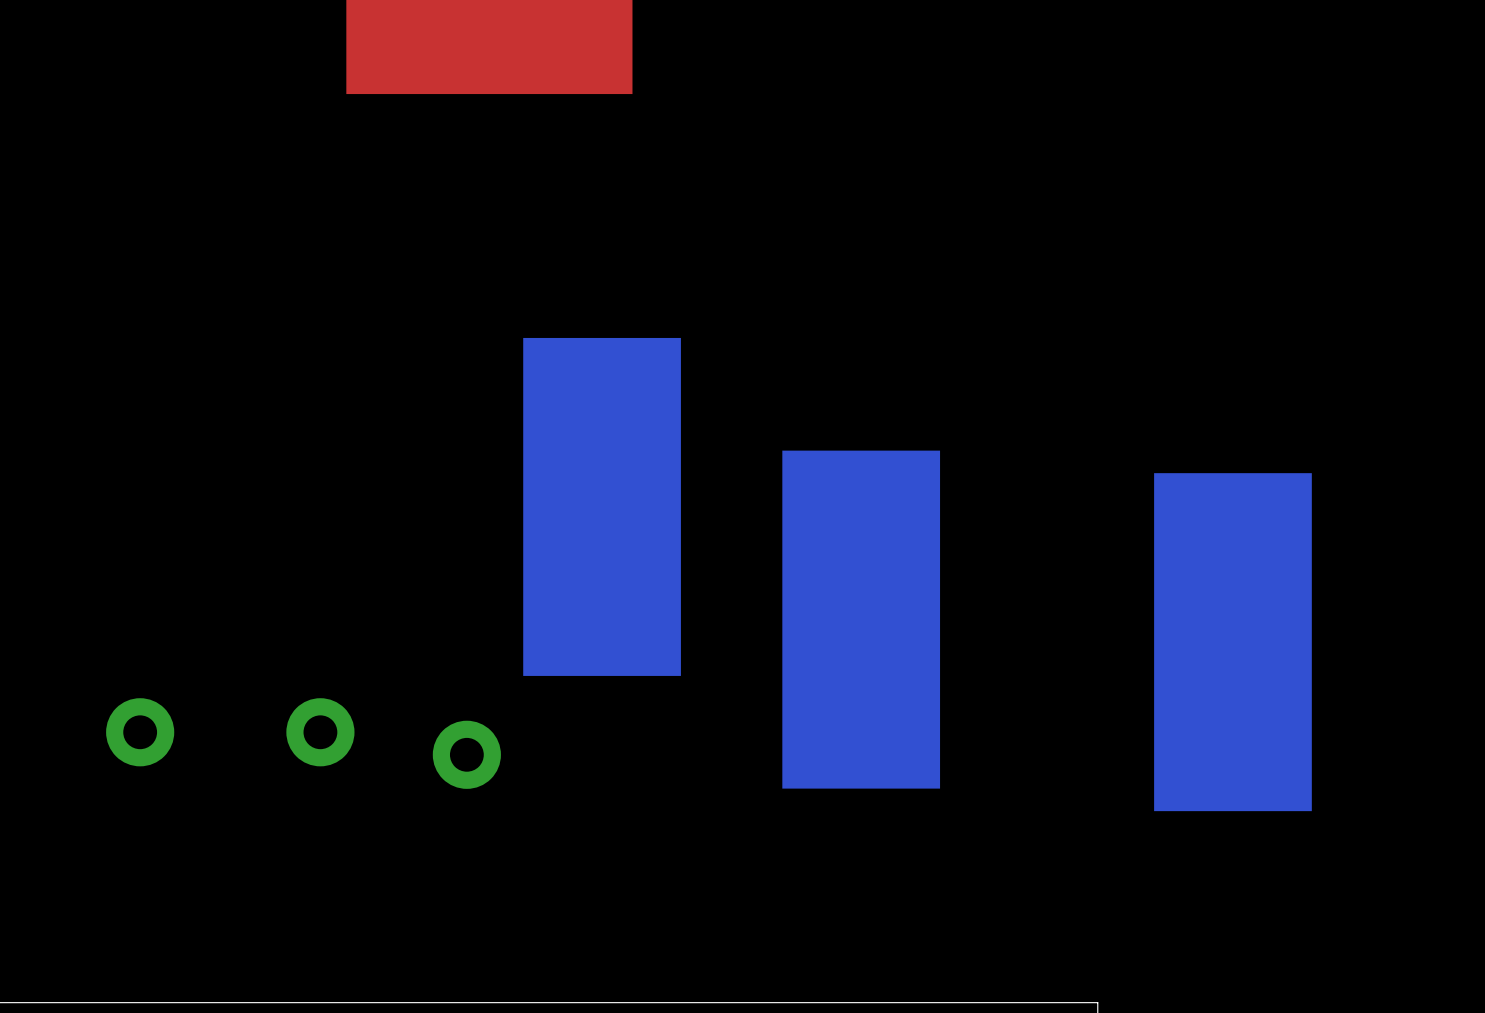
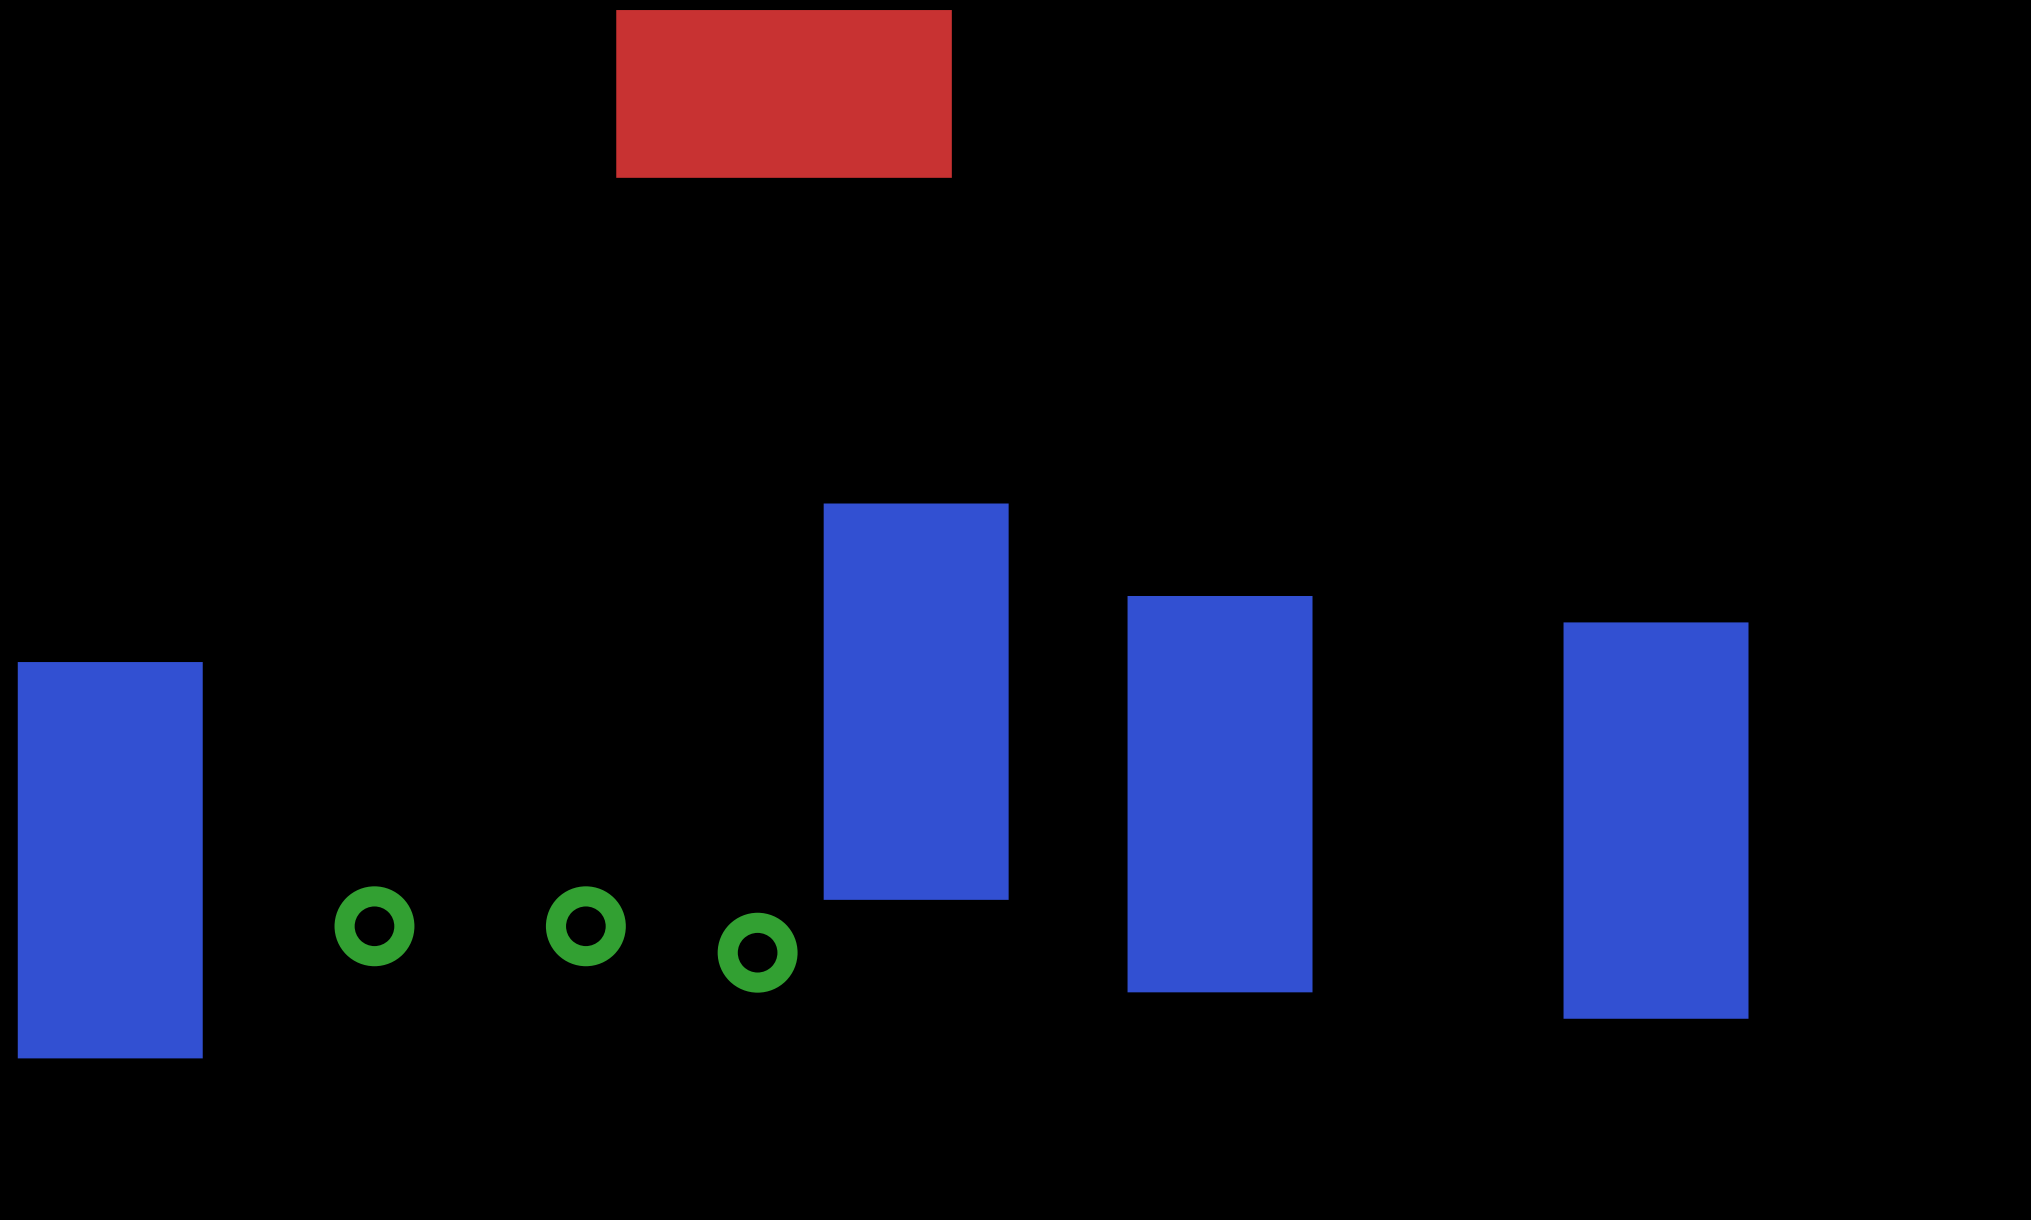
drawing position: (602, 506) -> (916, 701)

